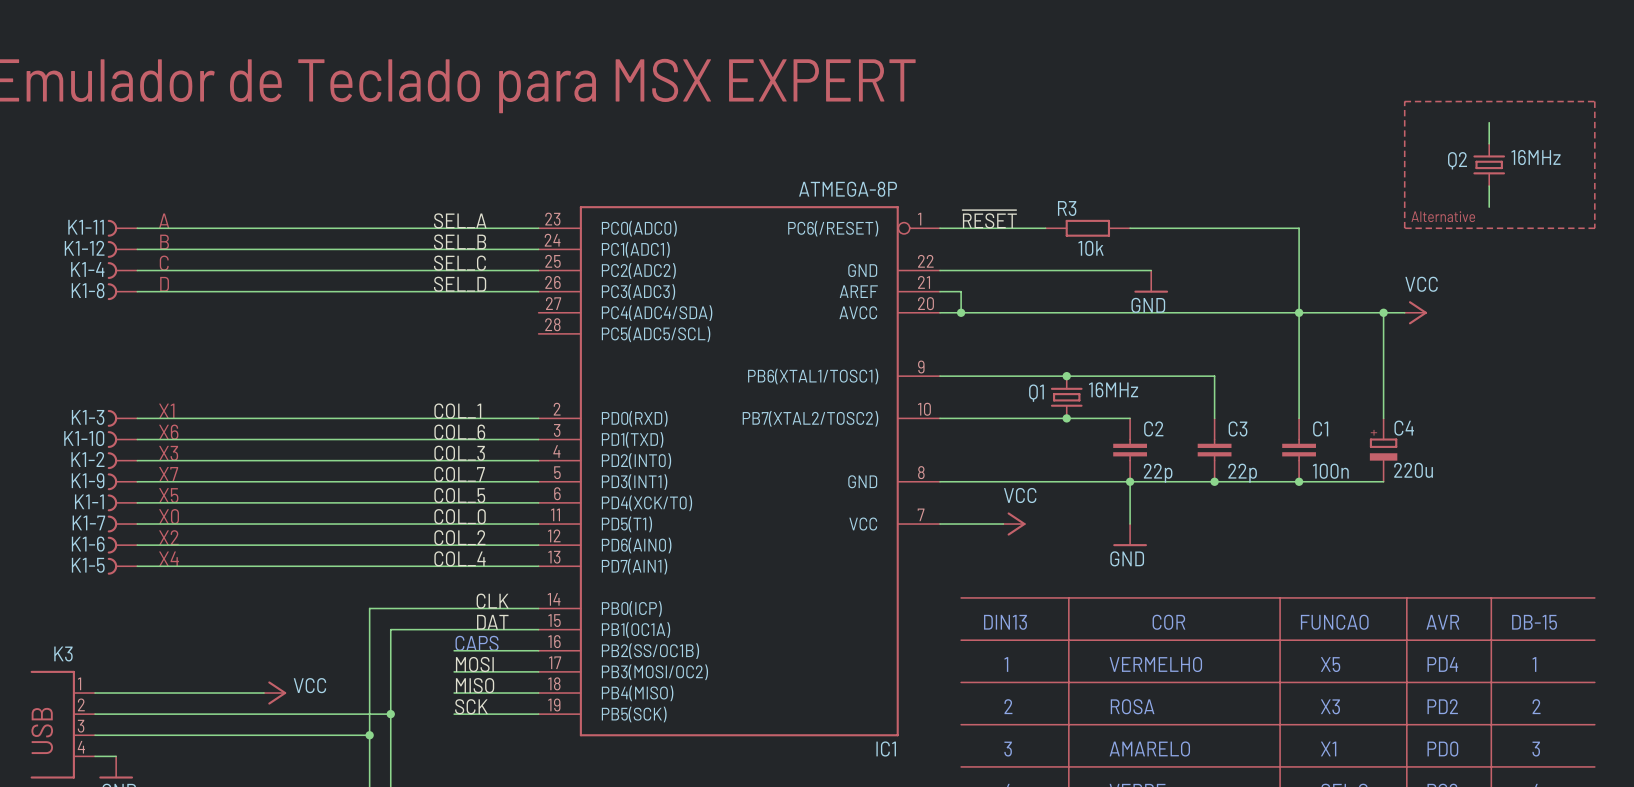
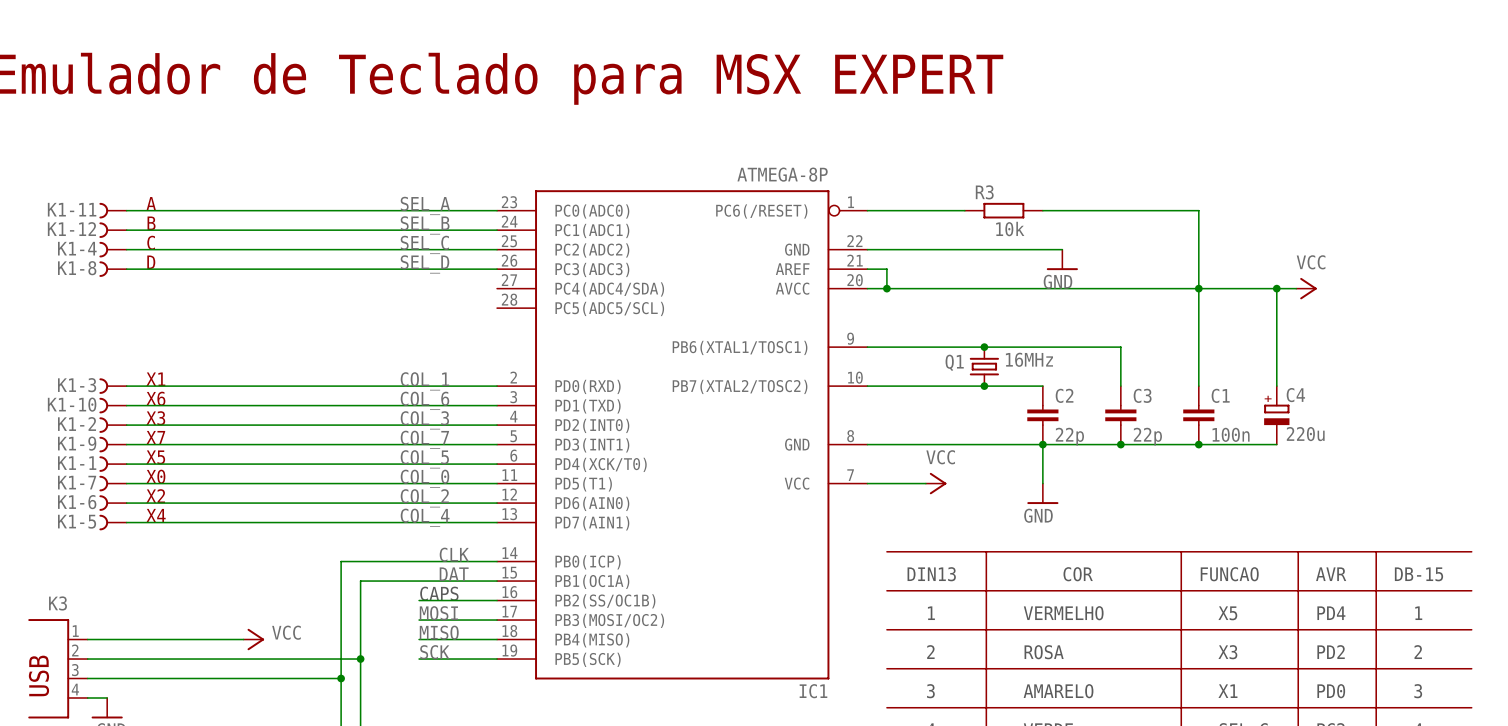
line: (1404, 101) (1594, 101) (1594, 228) (1404, 228) (1404, 101) -> none
wire: (1489, 122) (1489, 143) -> none
Q2: 16MHz (1489, 164) -> none
wire: (1489, 186) (1489, 207) -> none
text: Alternative (1443, 216) -> none
label: ~{RESET} (989, 219) -> none

